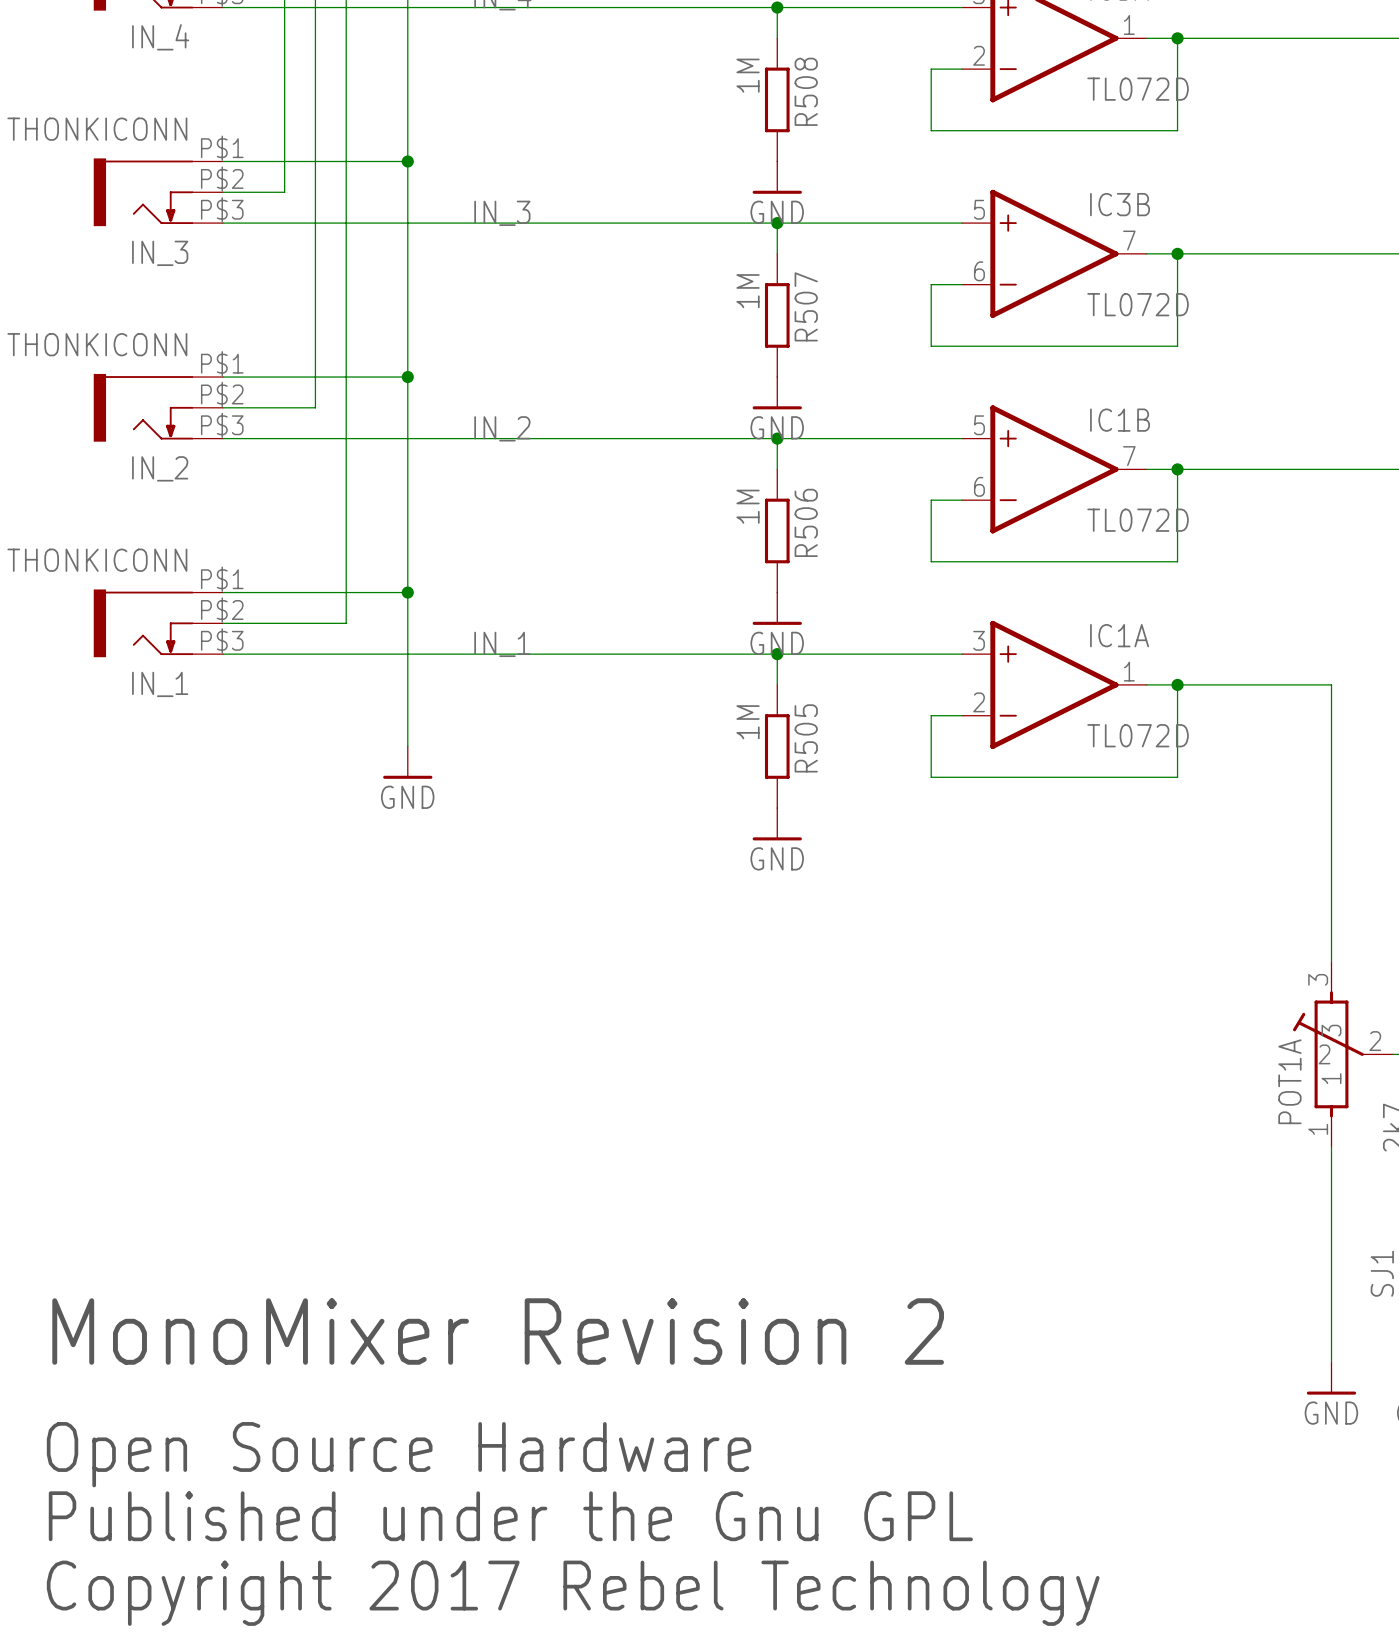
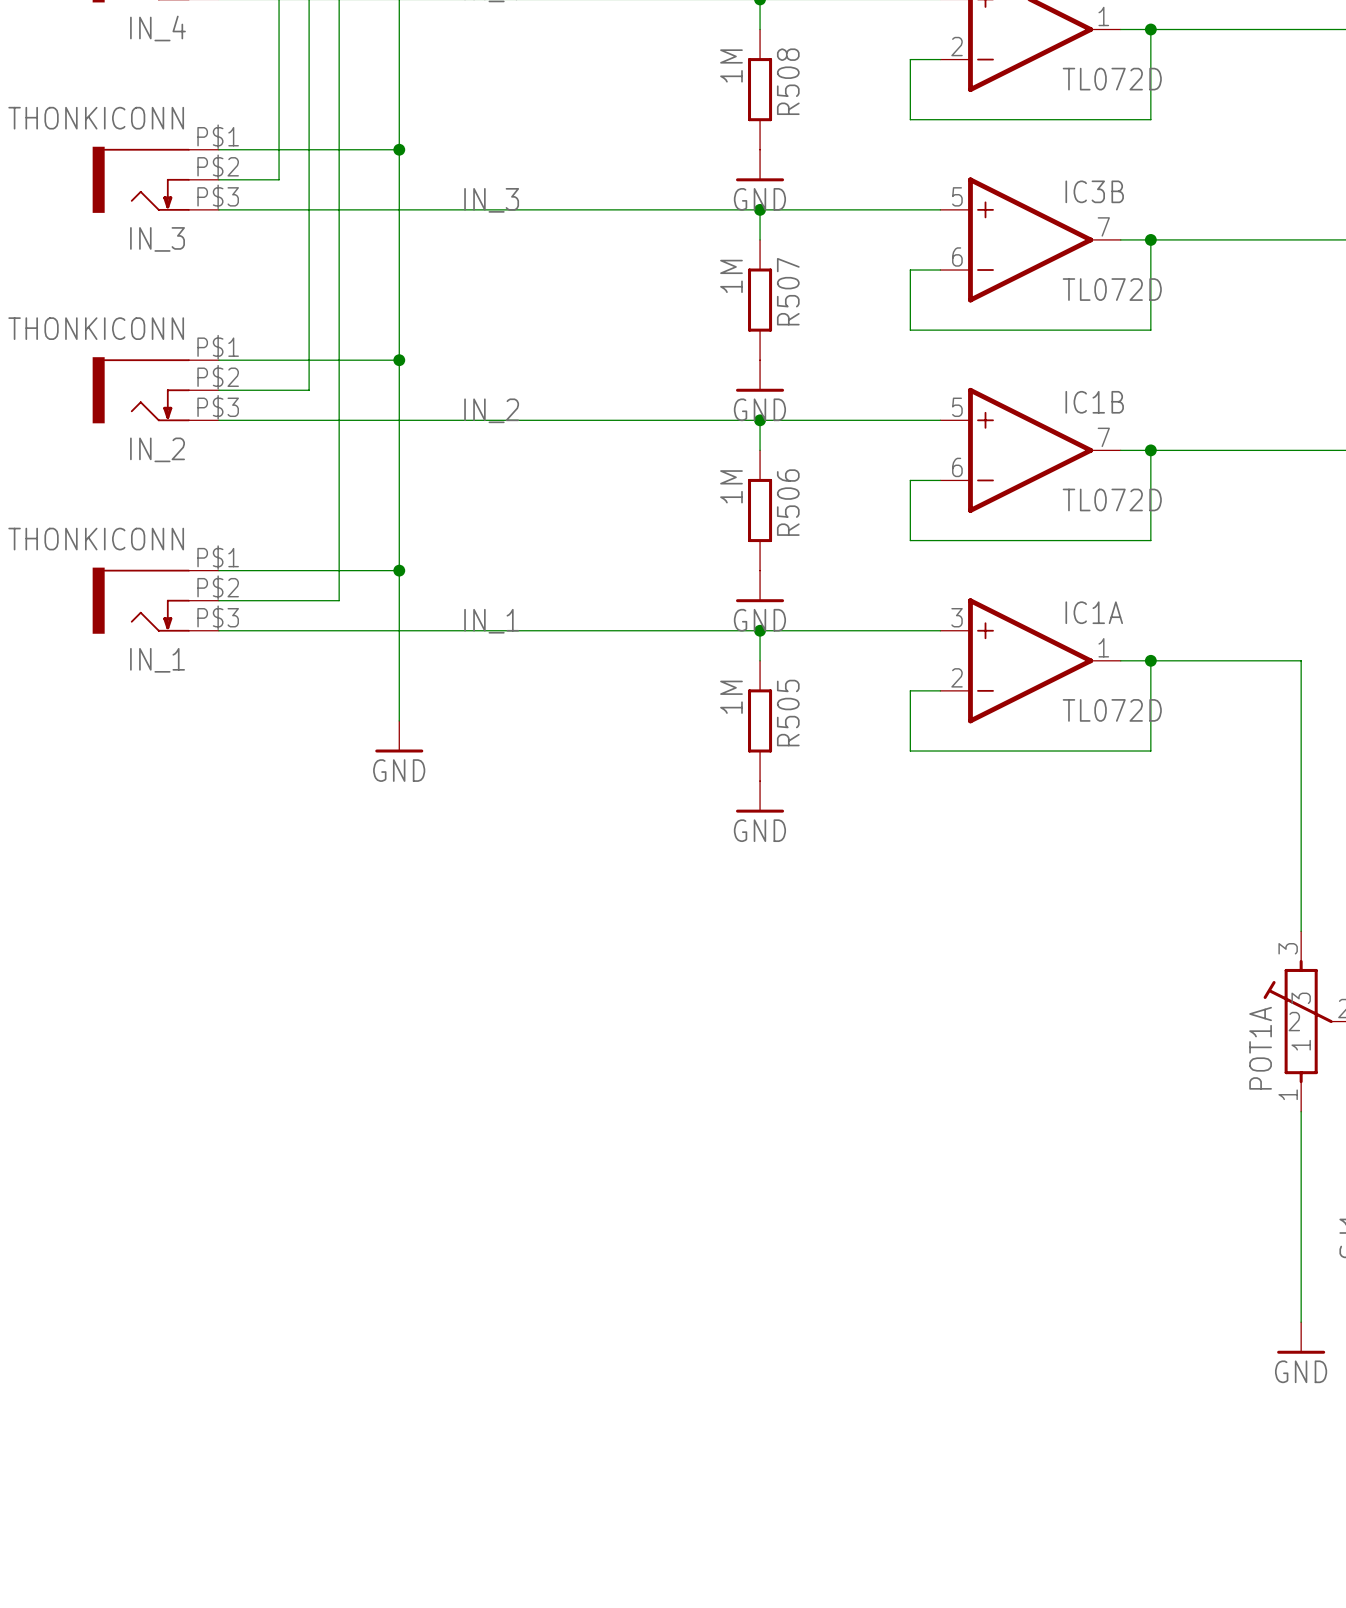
text: MonoMixer Revision 2 (498, 1331) -> none
text: Open Source Hardware (399, 1454) -> none
text: Published under the Gnu GPL (510, 1516) -> none
text: Copyright 2017 Rebel Technology (573, 1593) -> none

